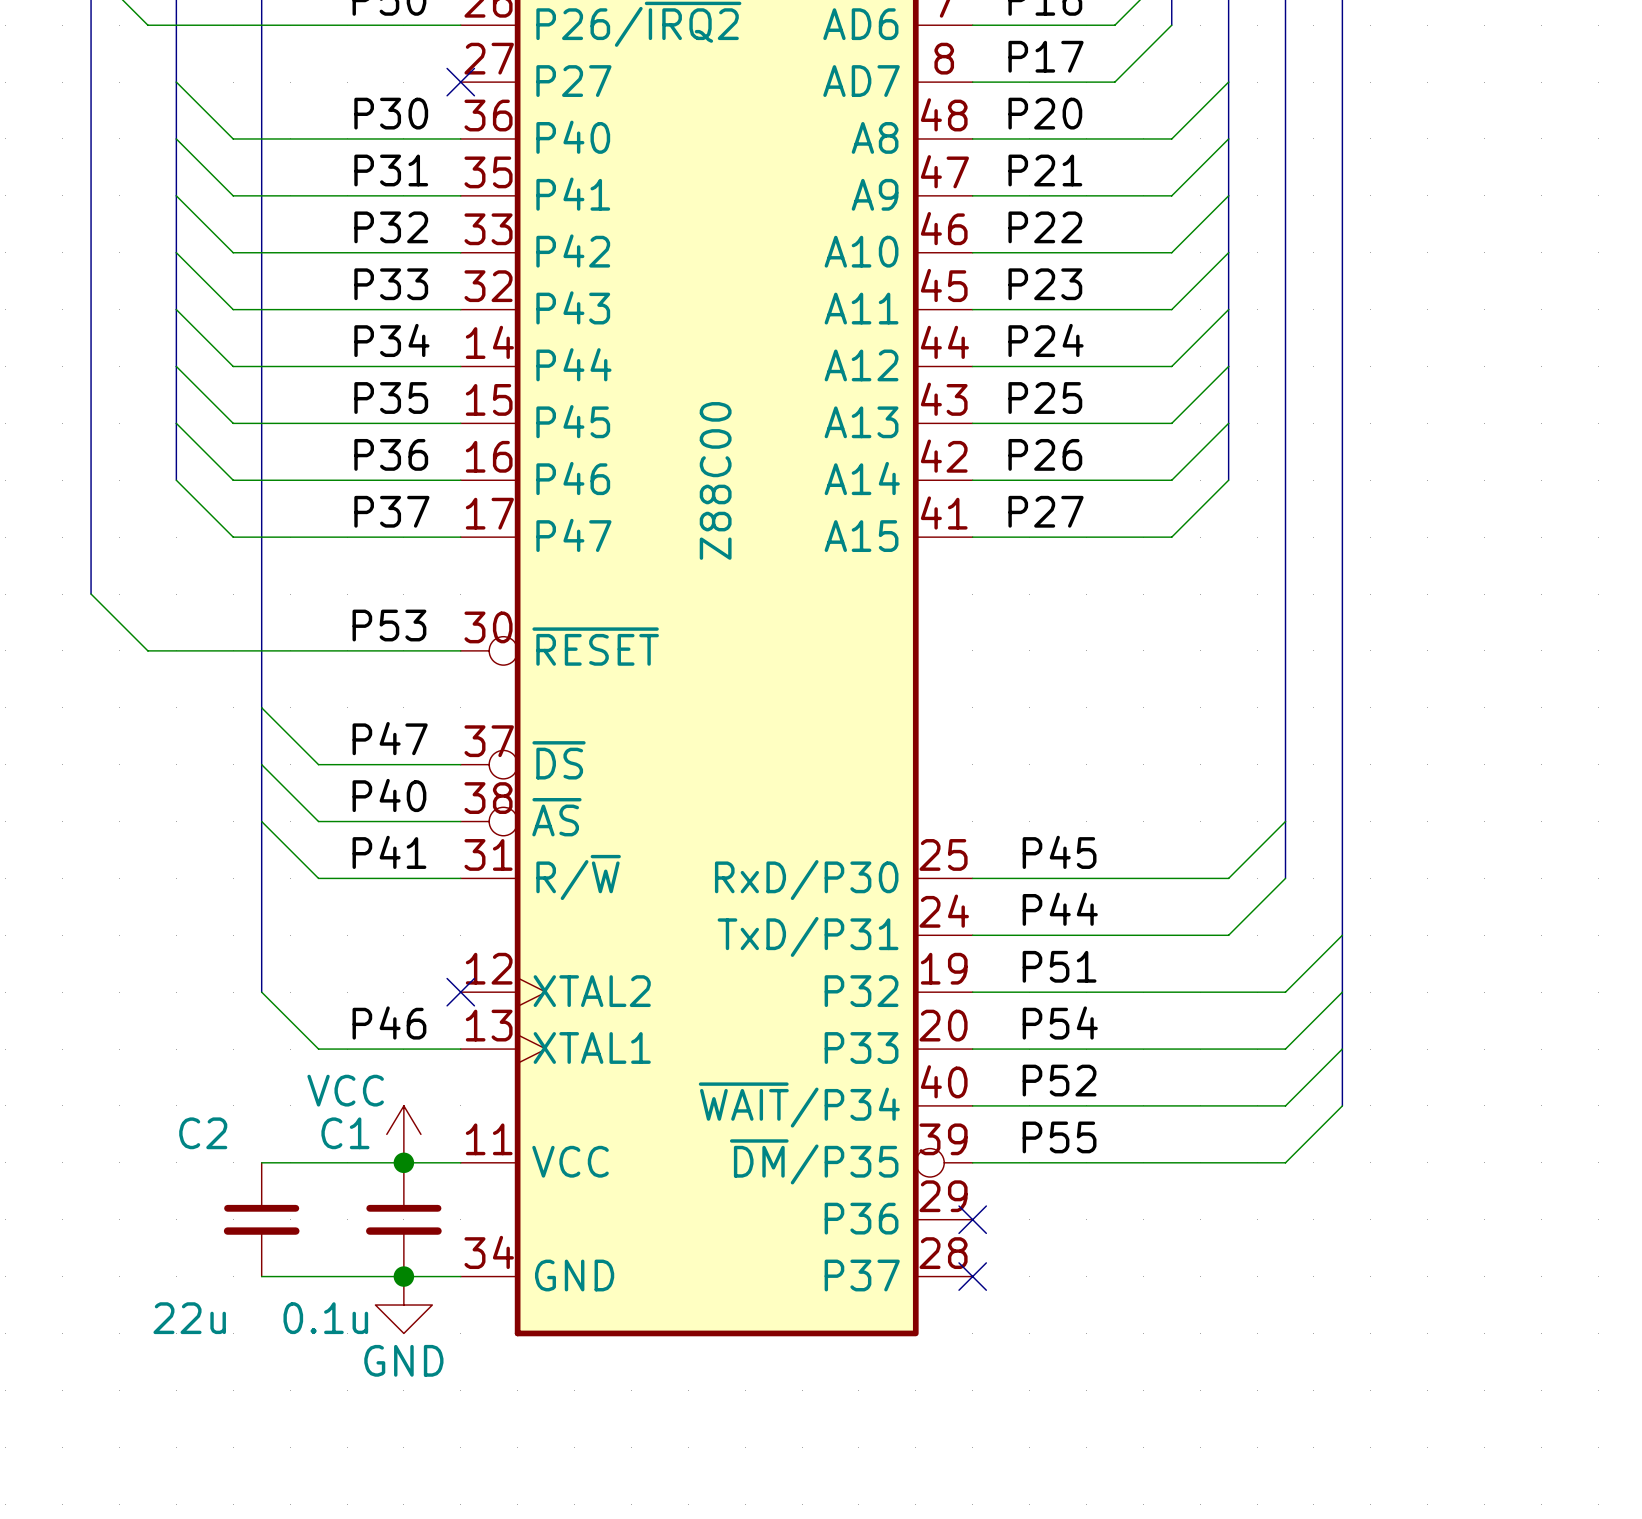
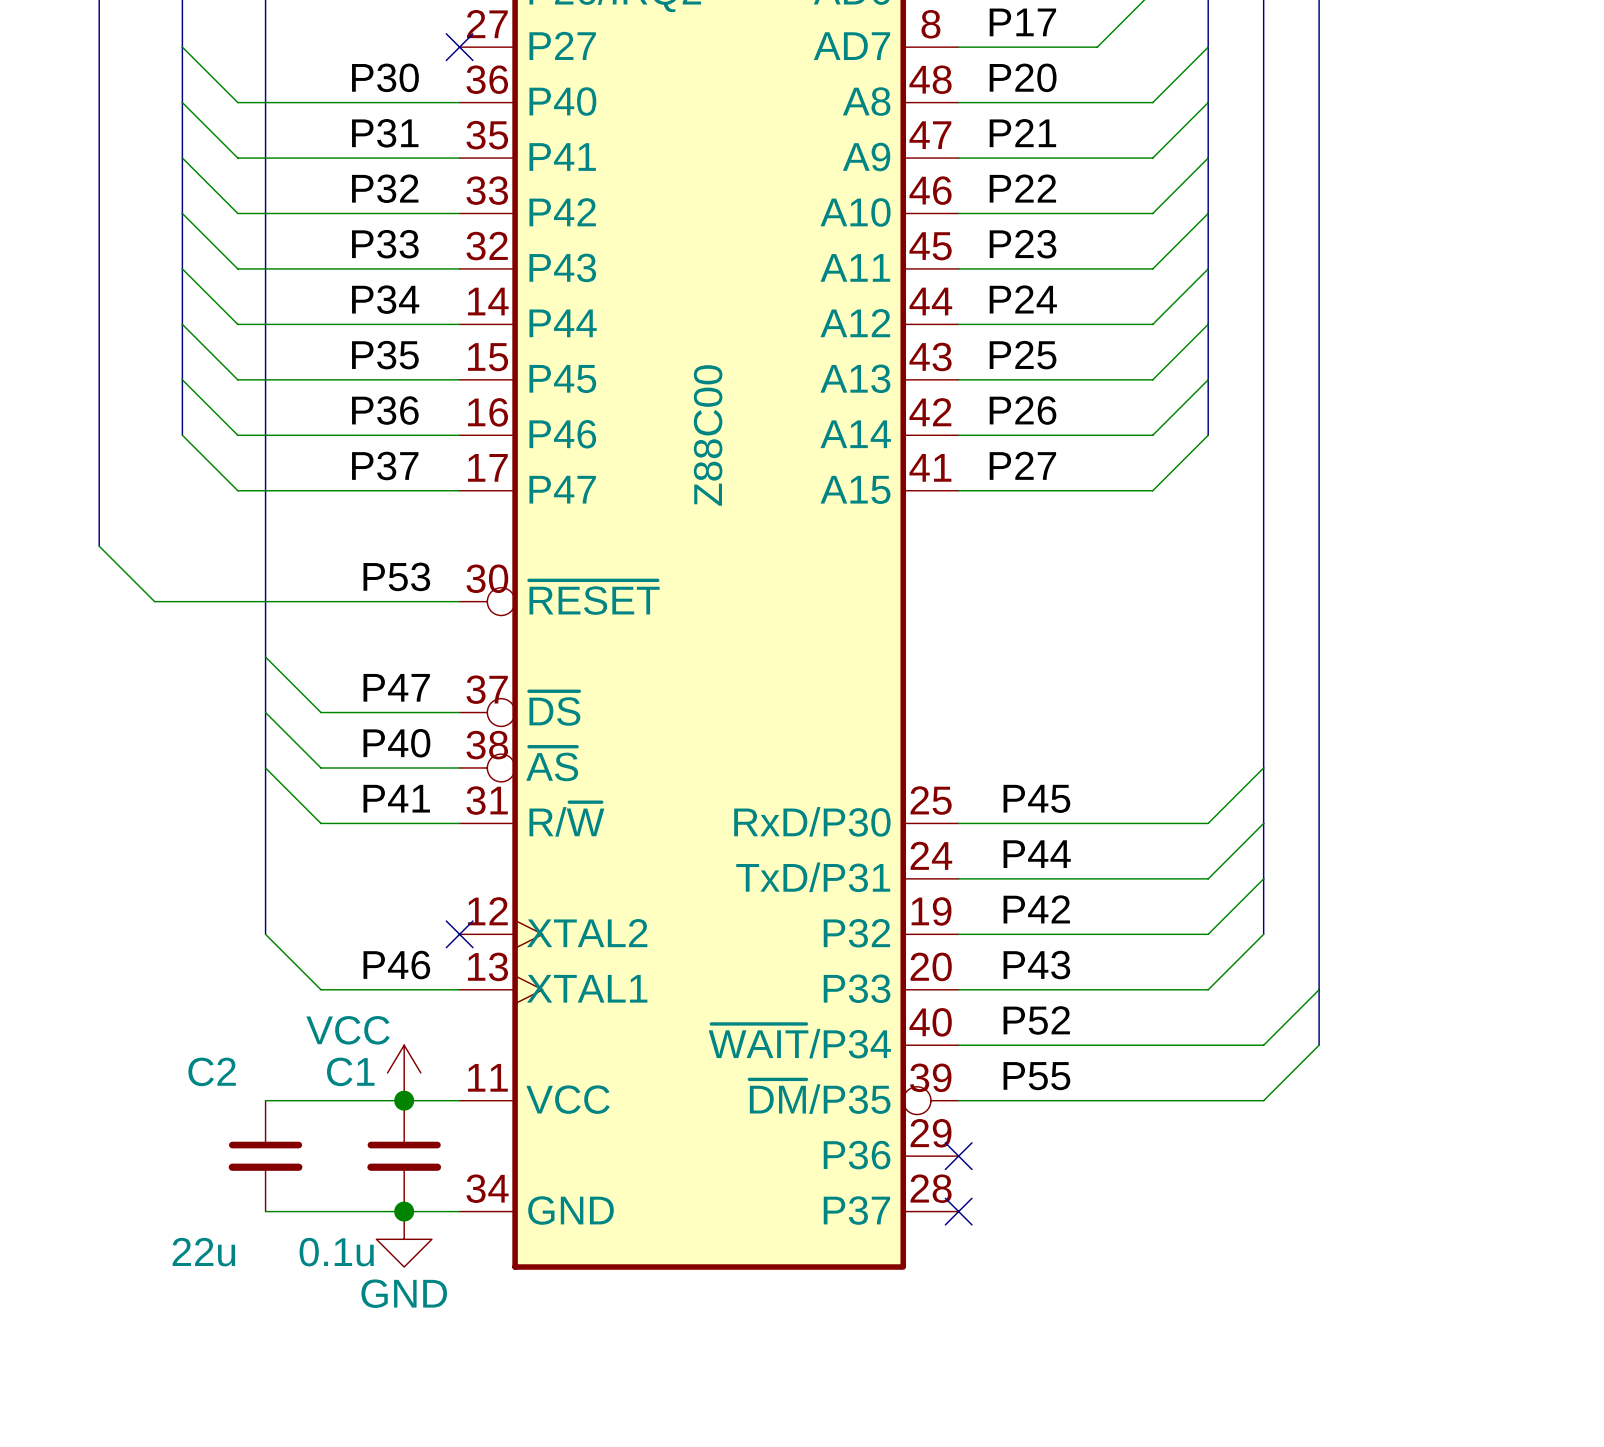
bus: none -> (1263, 823) (1263, 934)
wire: (1342, 935) (1285, 992) (1228, 992) -> (1263, 878) (1208, 934)
label: P51 (1059, 966) -> P42 (1036, 909)
wire: (1342, 992) (1285, 1049) (1228, 1049) -> (1263, 934) (1208, 989)
label: P54 (1060, 1022) -> P43 (1036, 965)

